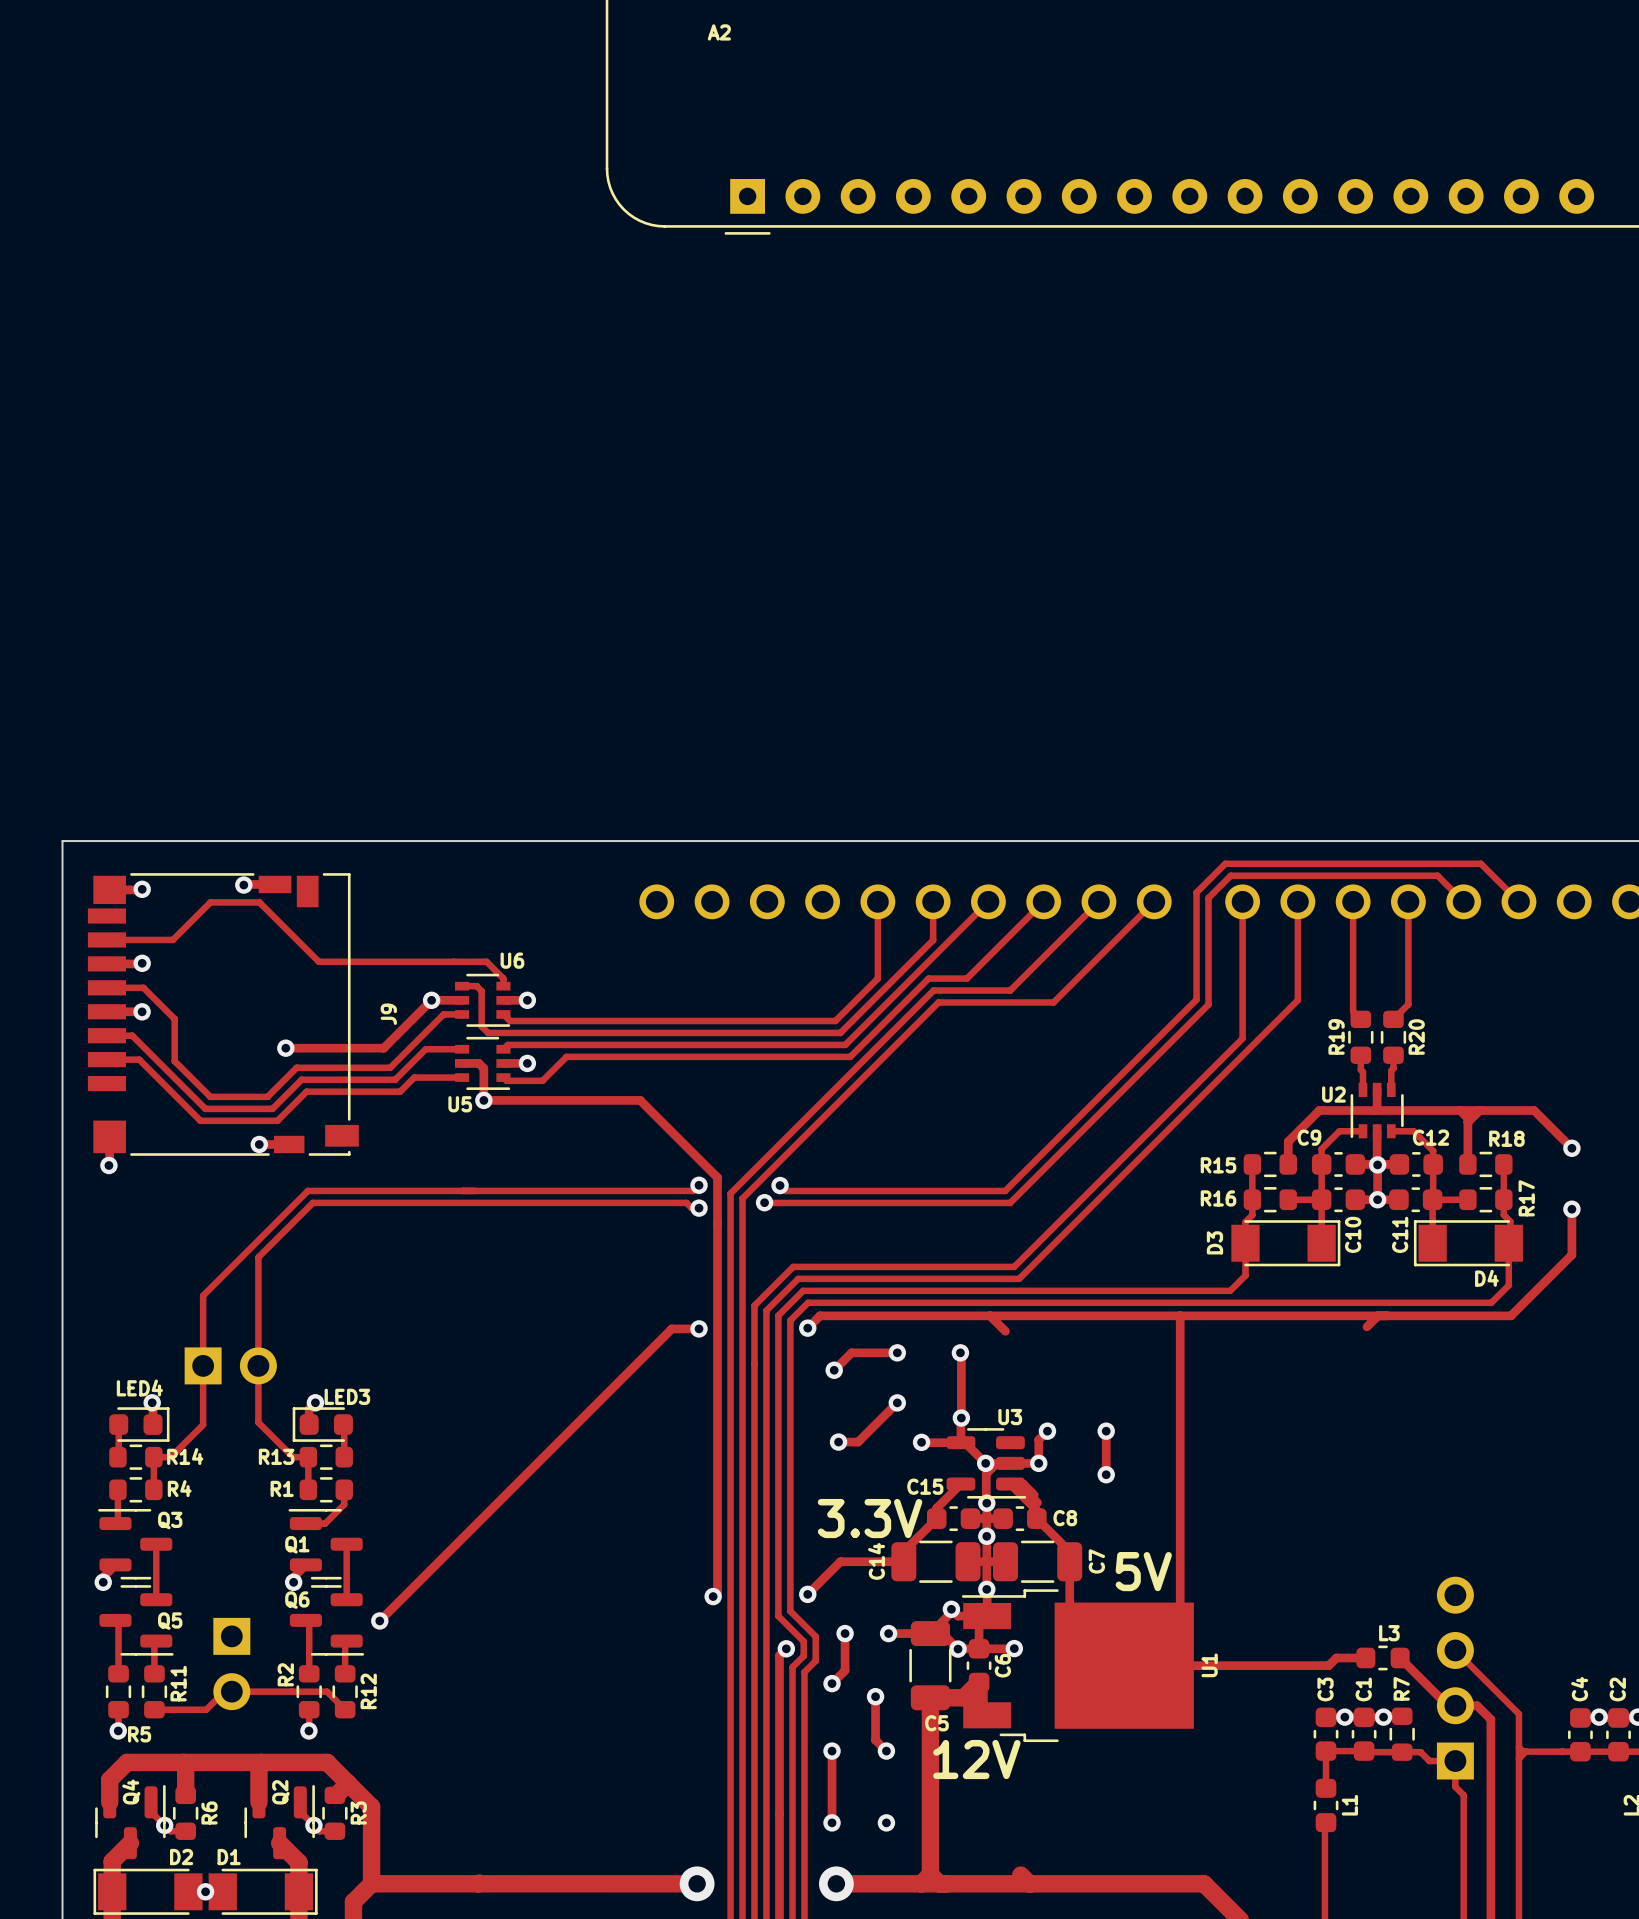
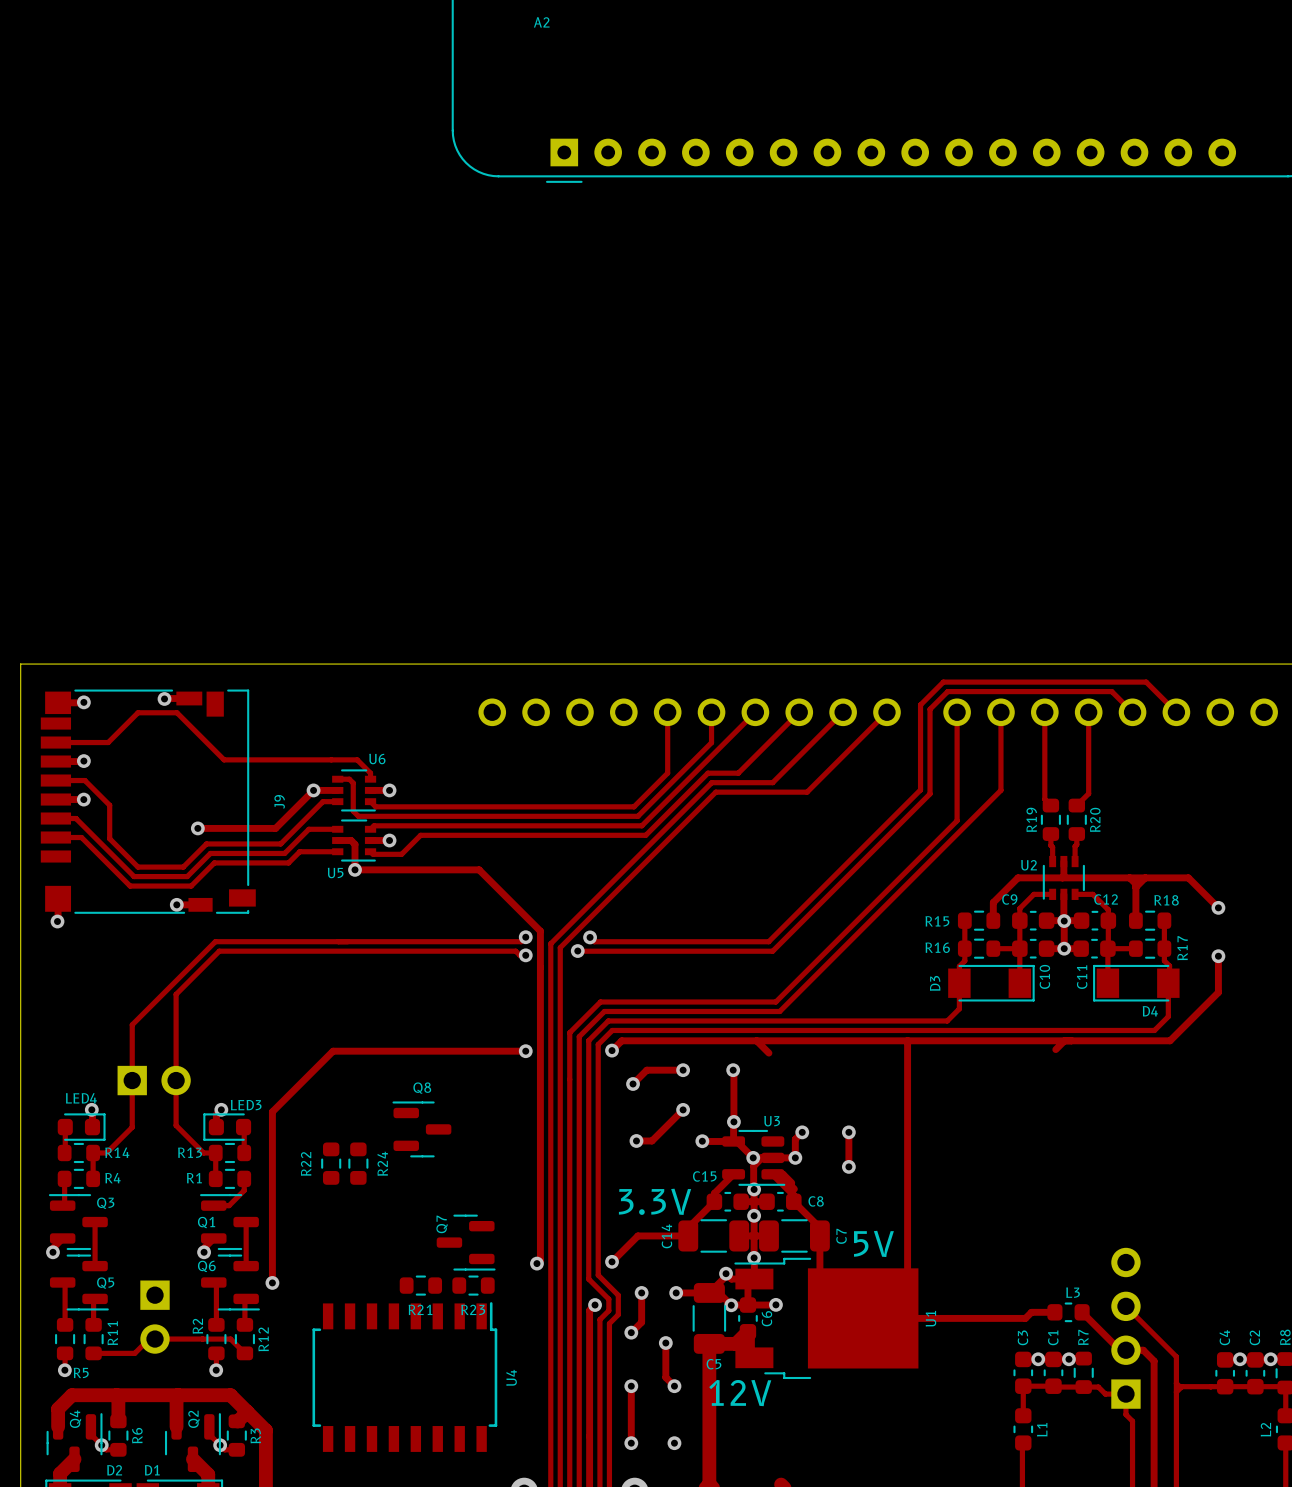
track: (671, 1328) (379, 1620) -> (504, 1051) (333, 1051) (272, 1111) (272, 1282)
Q8: none -> (421, 1129)
R22: none -> (331, 1163)
R24: none -> (358, 1163)
Q7: none -> (466, 1242)
R21: none -> (420, 1285)
R23: none -> (473, 1285)
U4: none -> (404, 1377)

